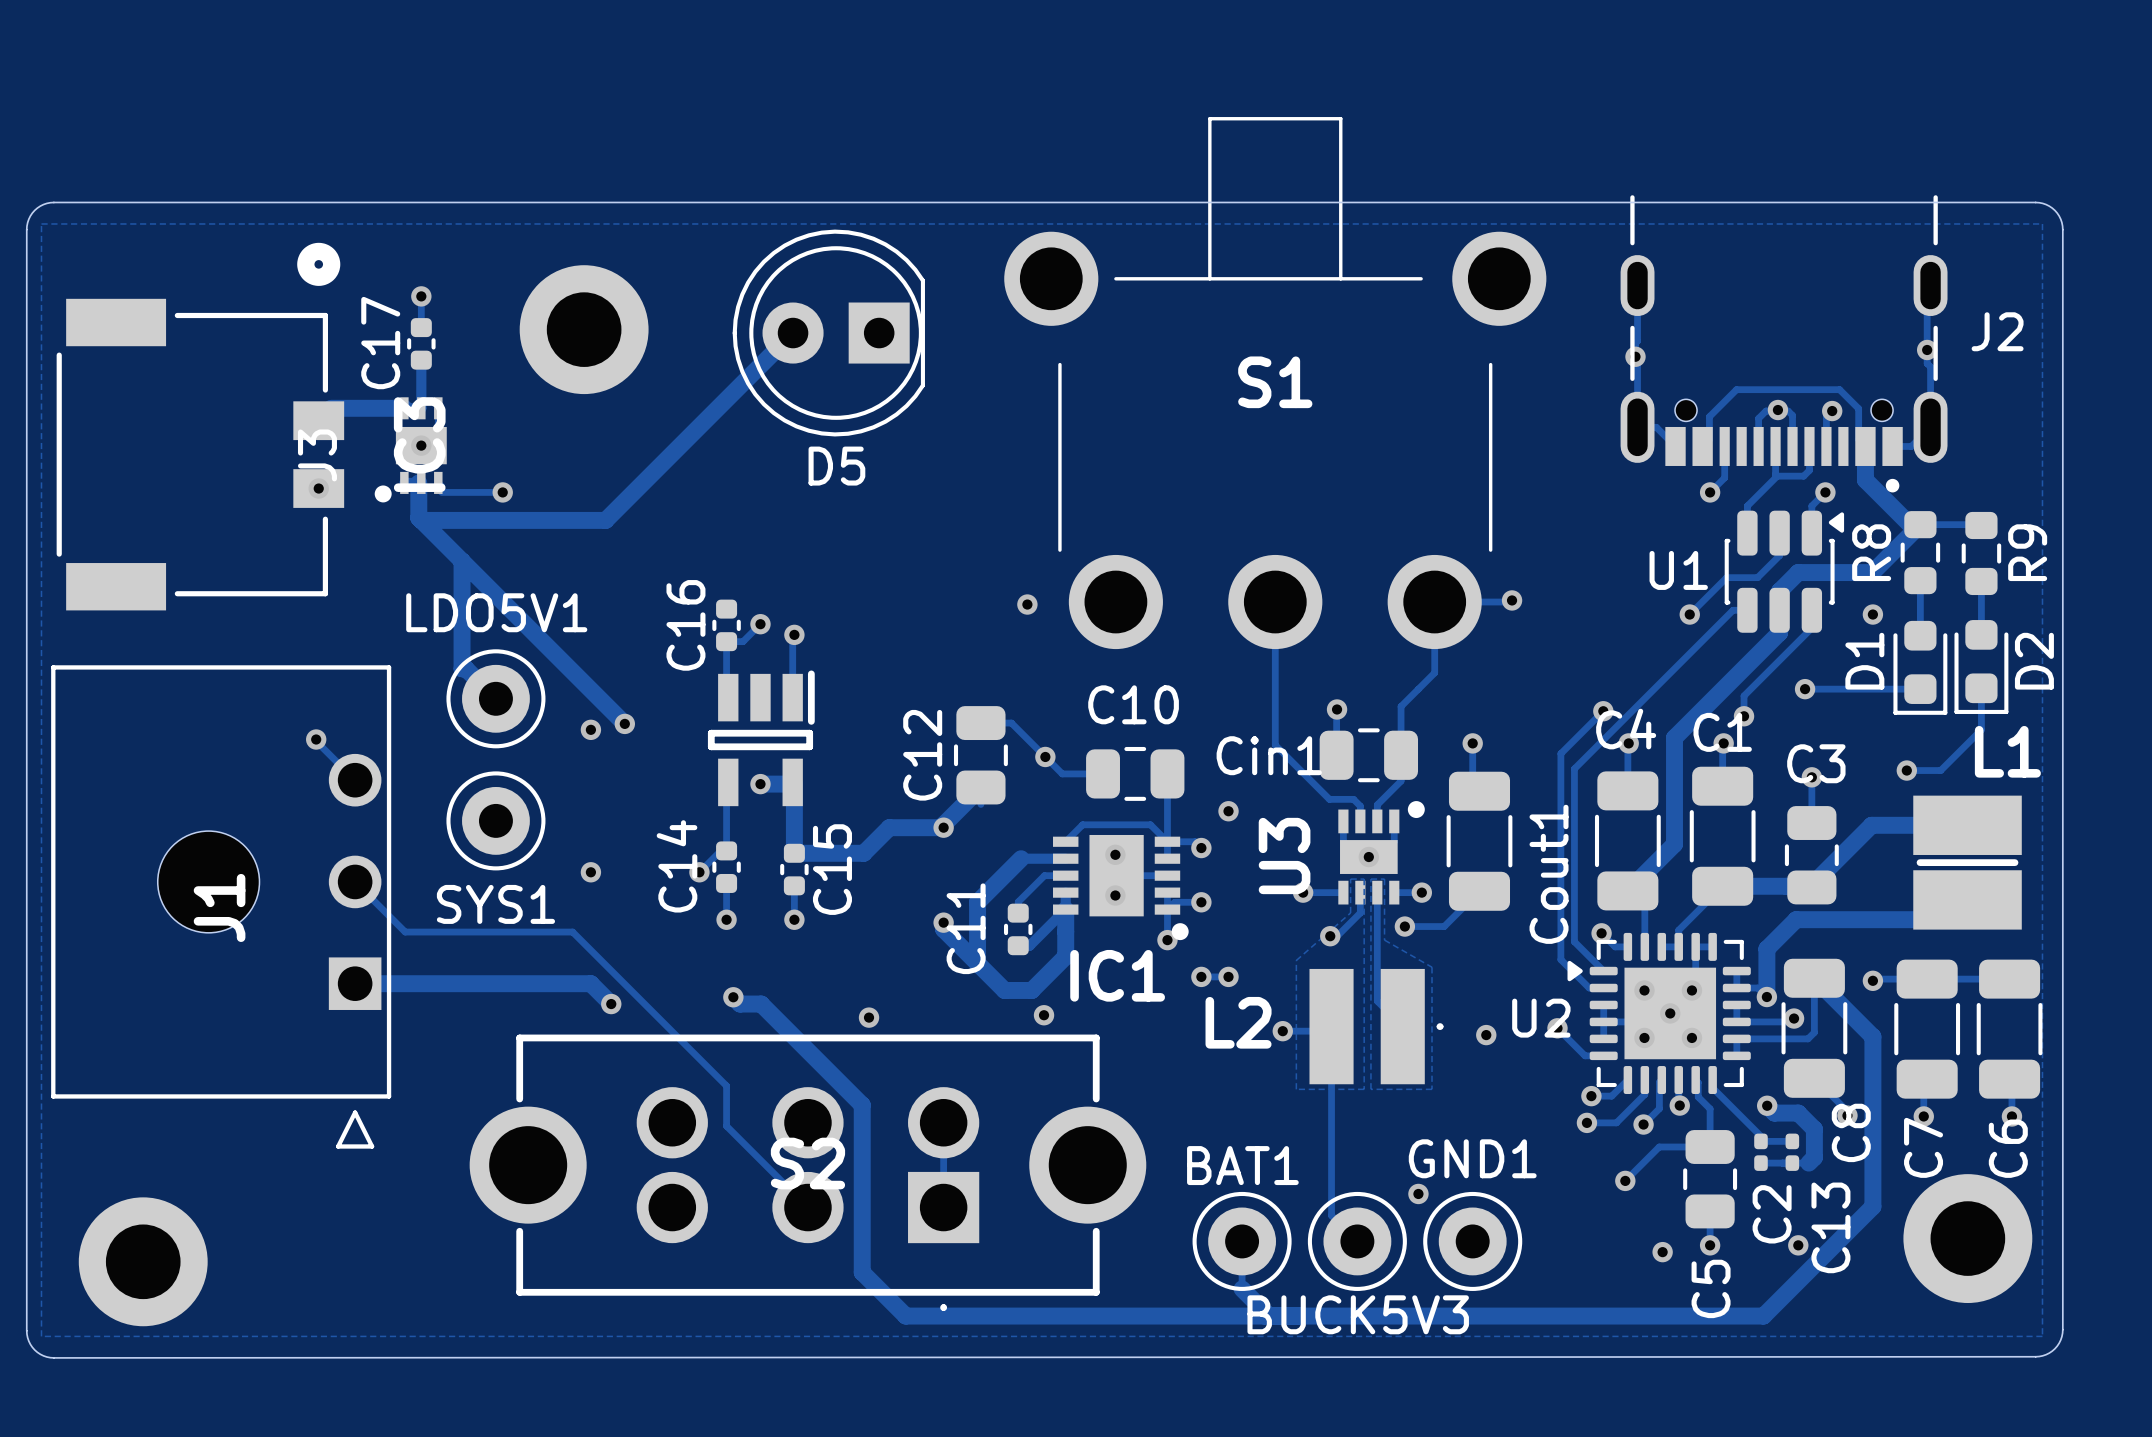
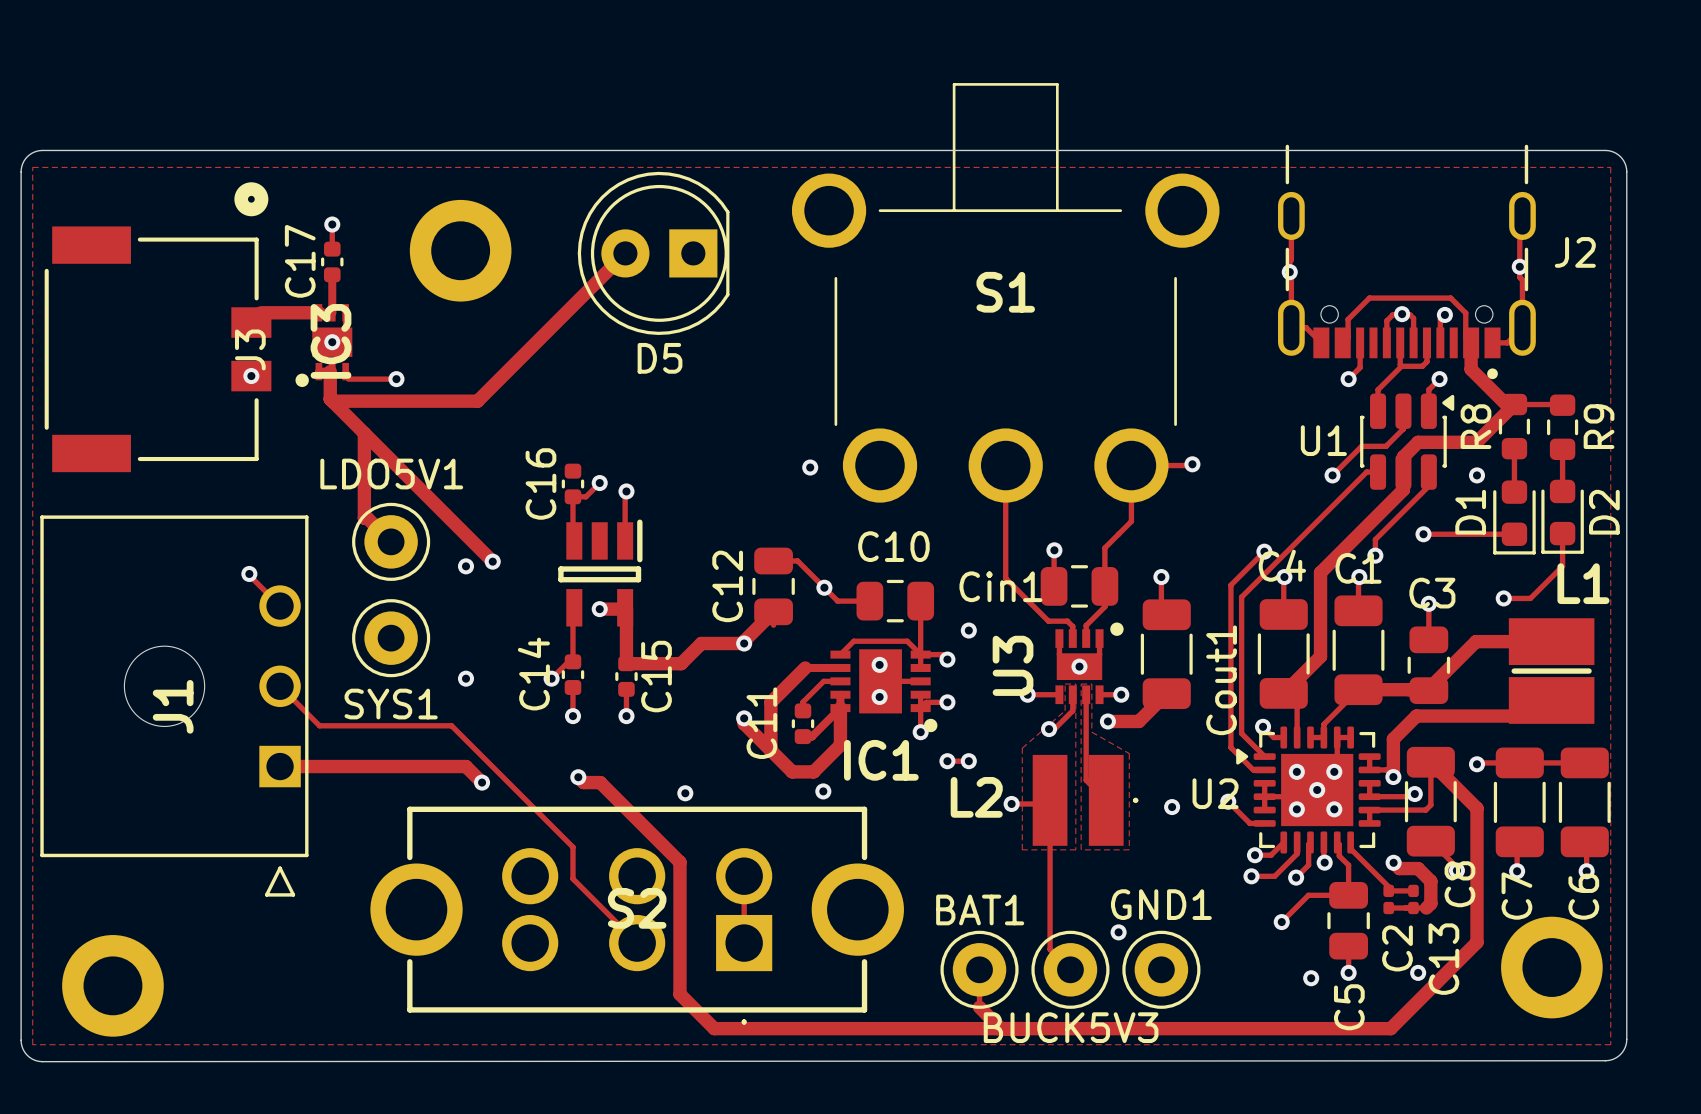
track width: thin (1479, 891) (1444, 926) (1404, 926) -> thick (1166, 693) (1138, 721) (1107, 721)

